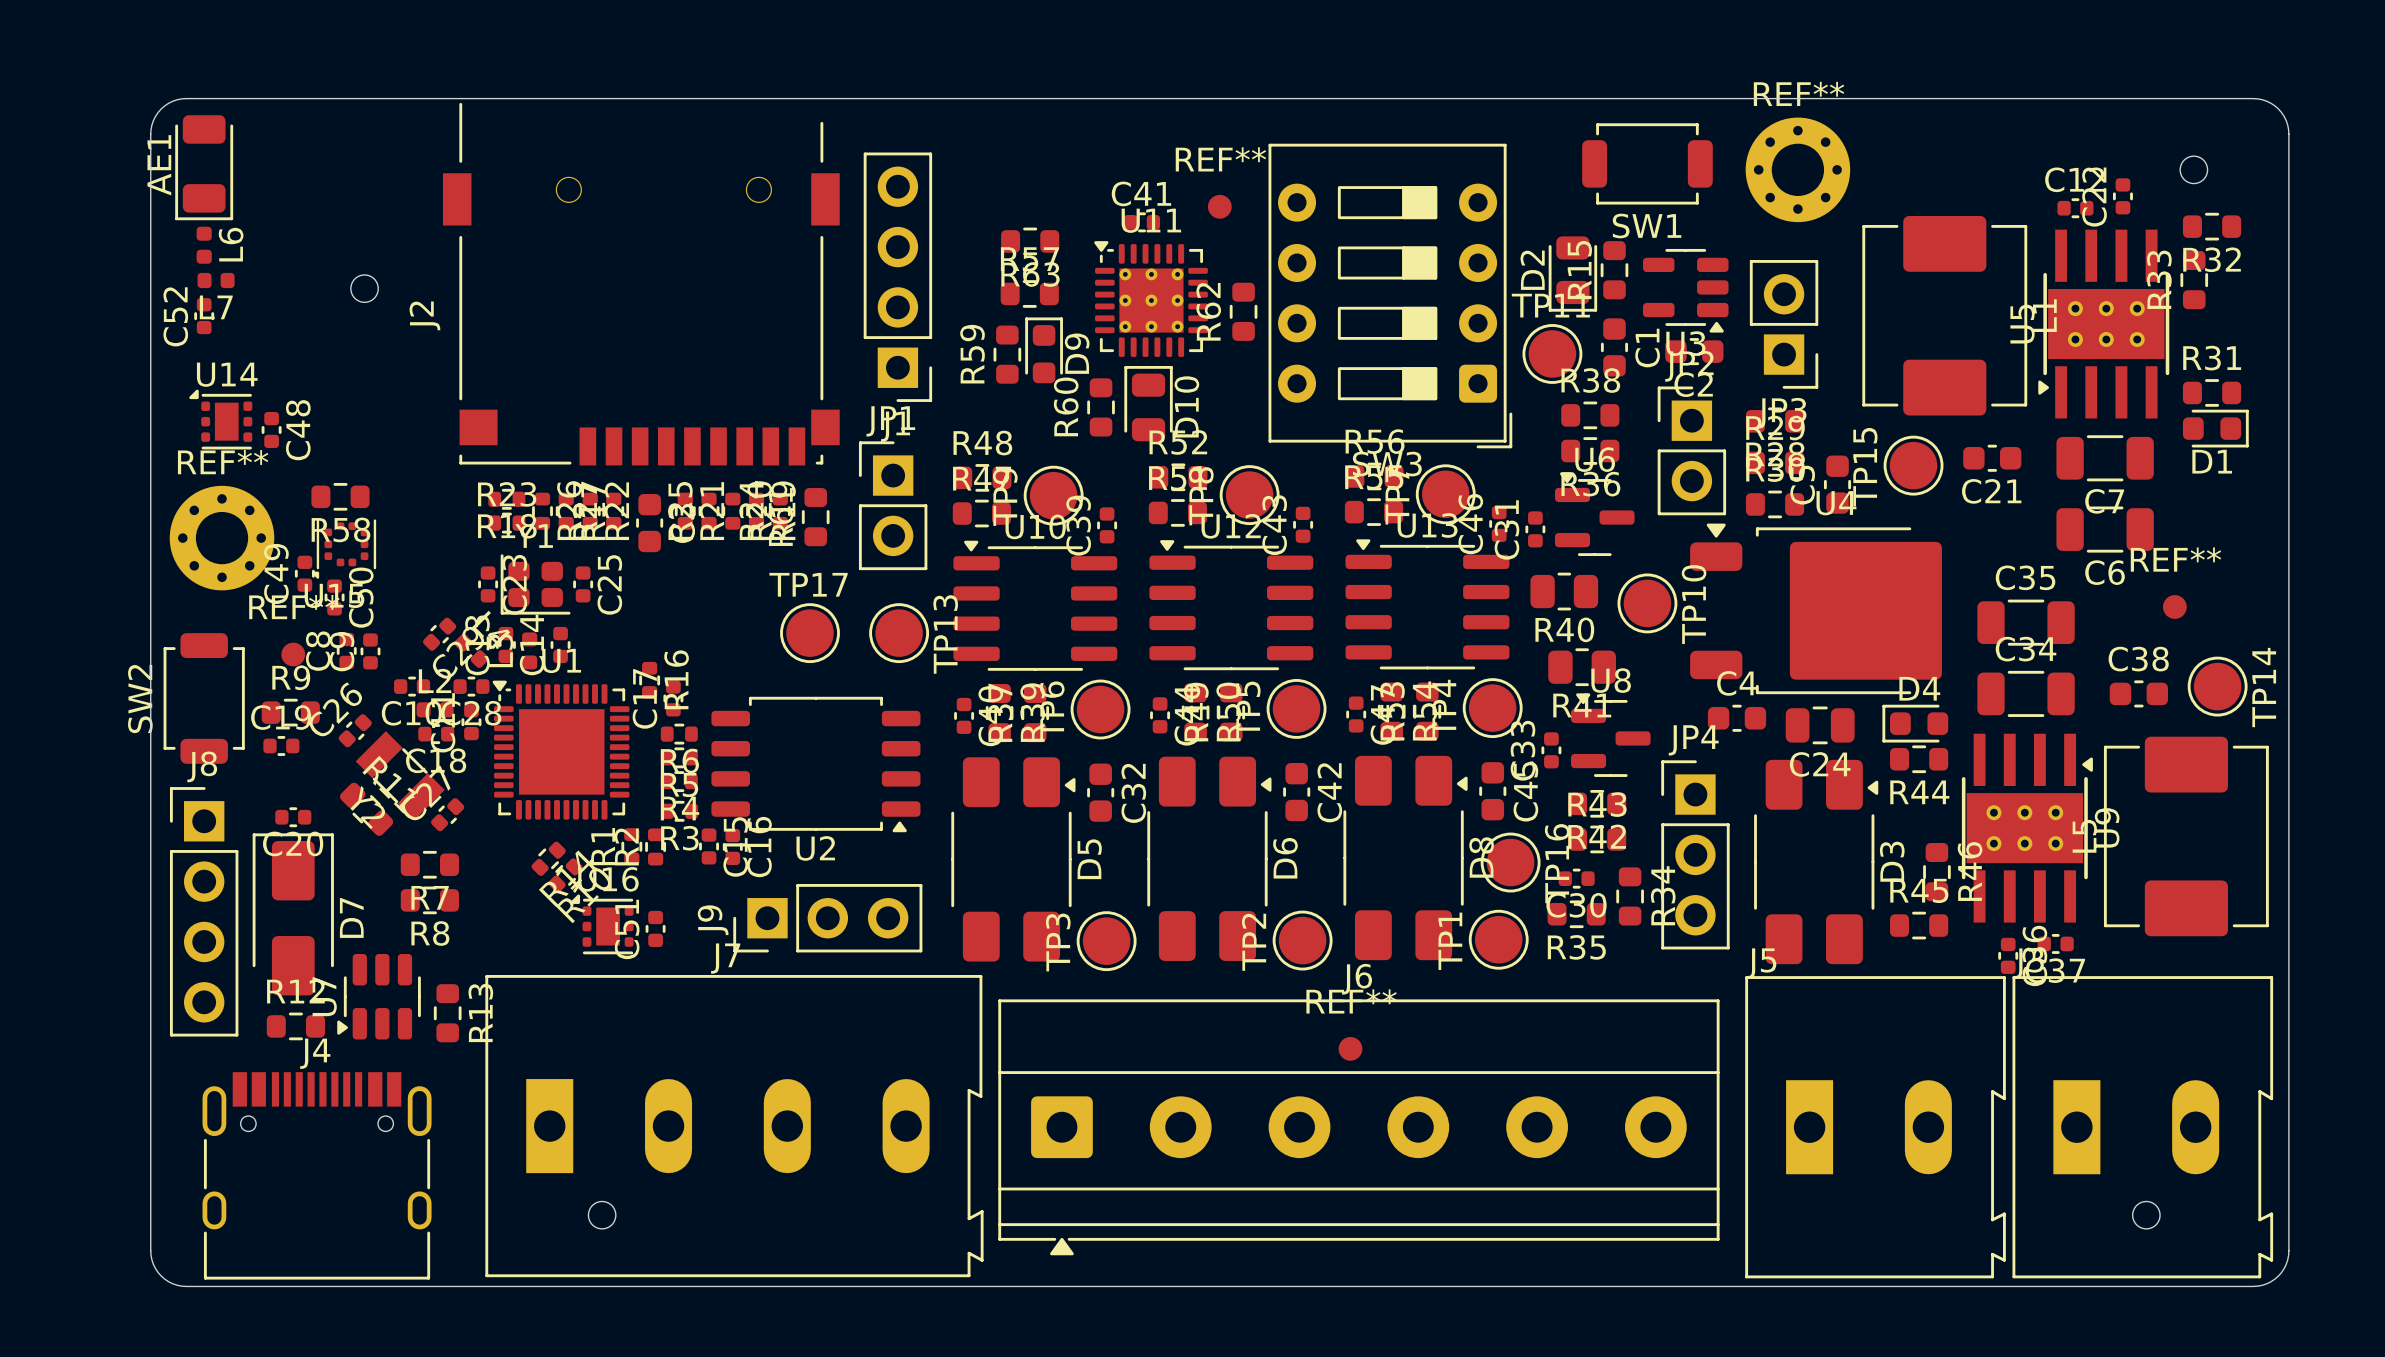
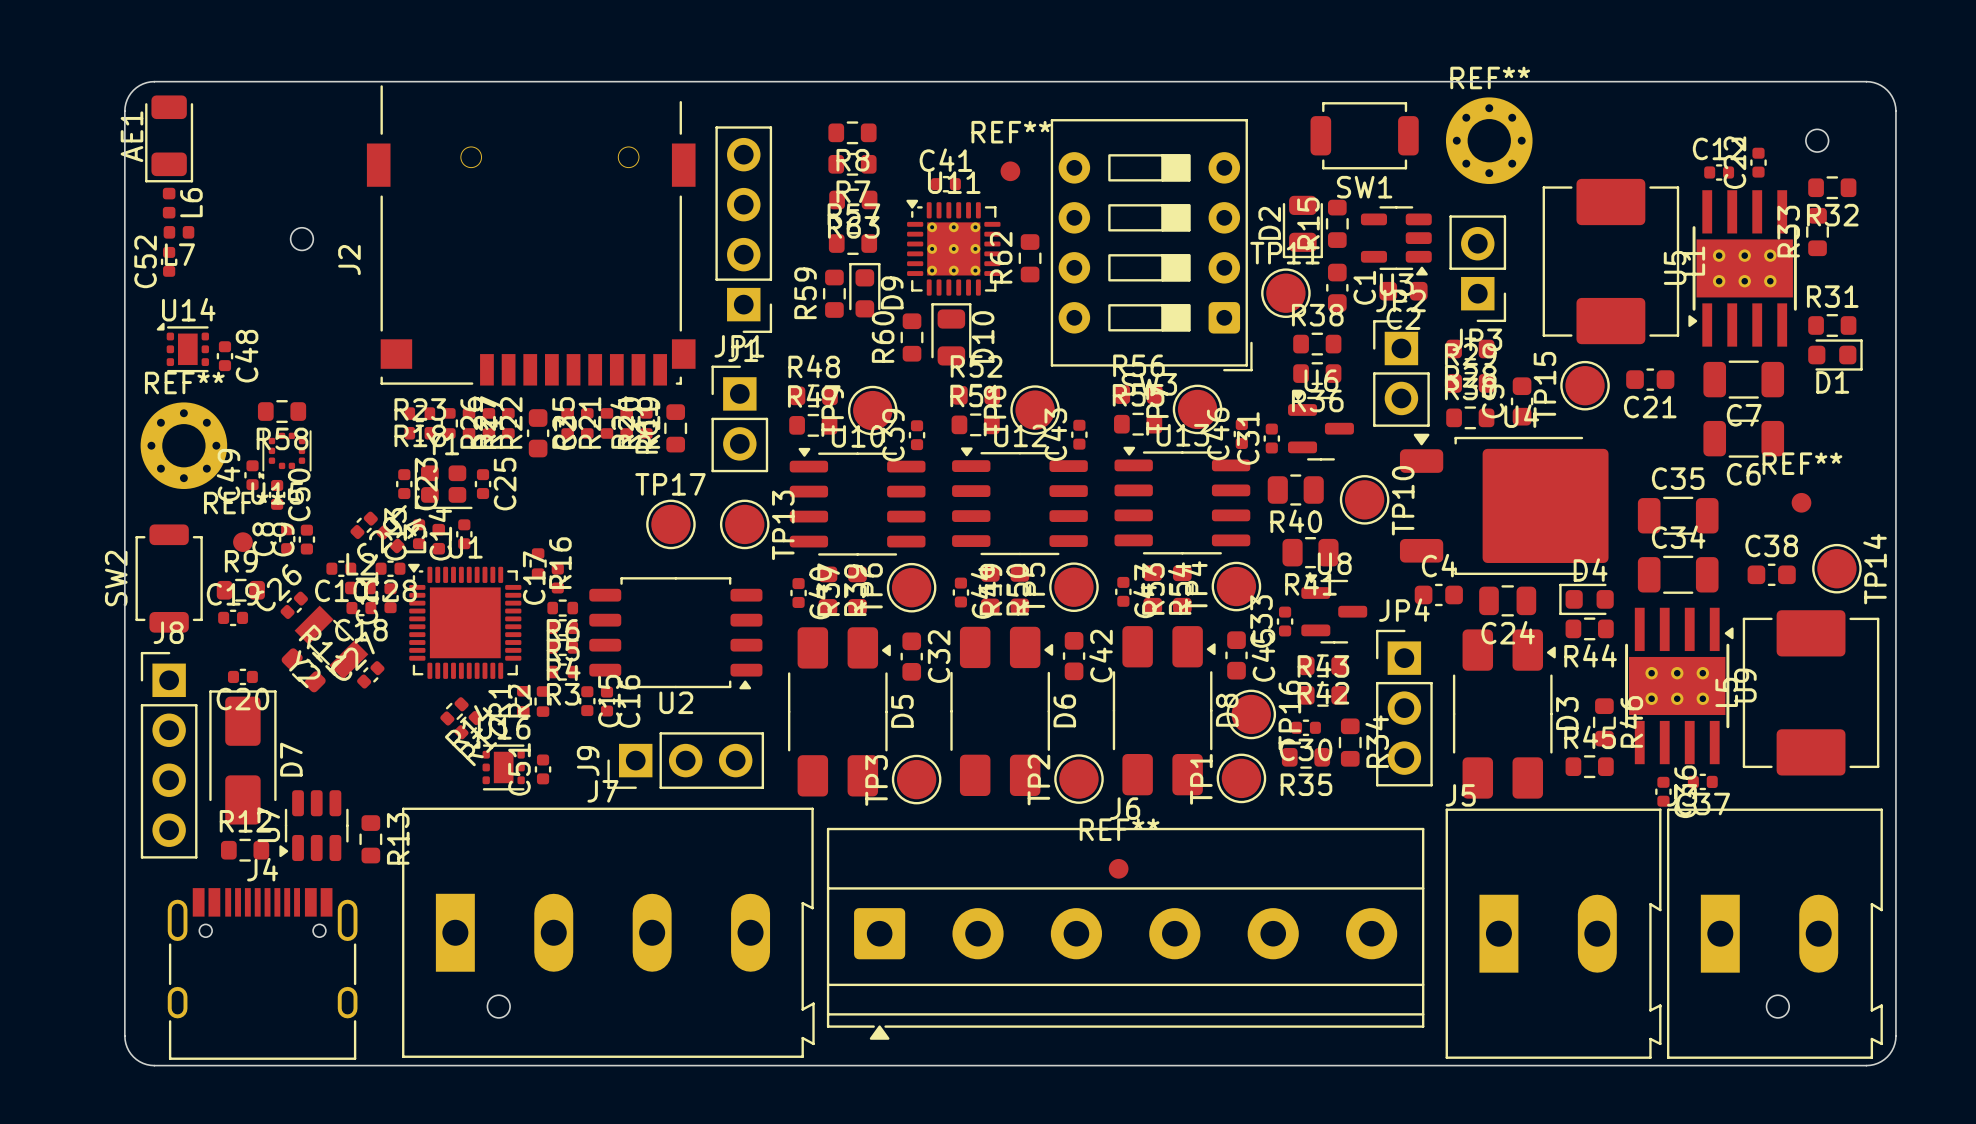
R7 position: (429, 864) -> (852, 164)
R8 position: (429, 900) -> (852, 132)

